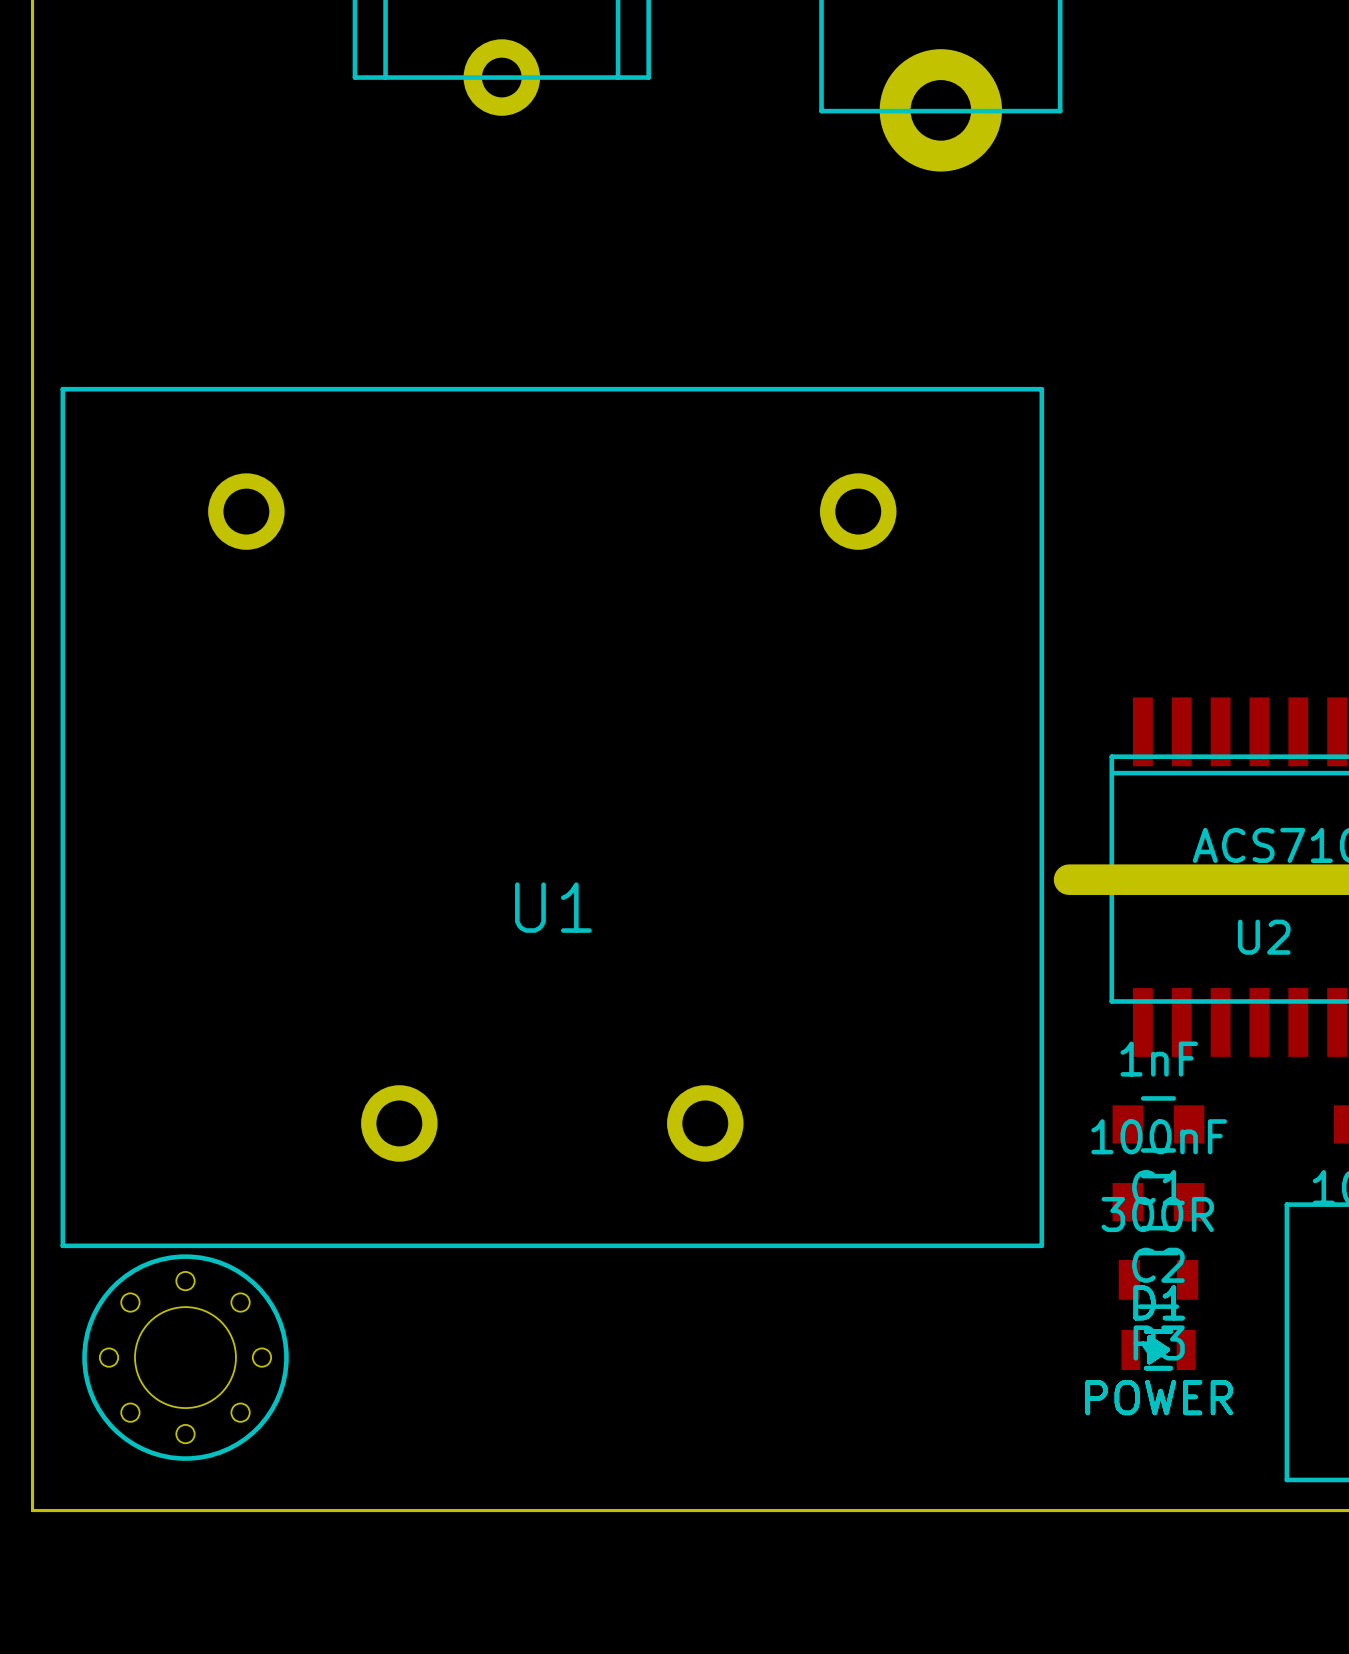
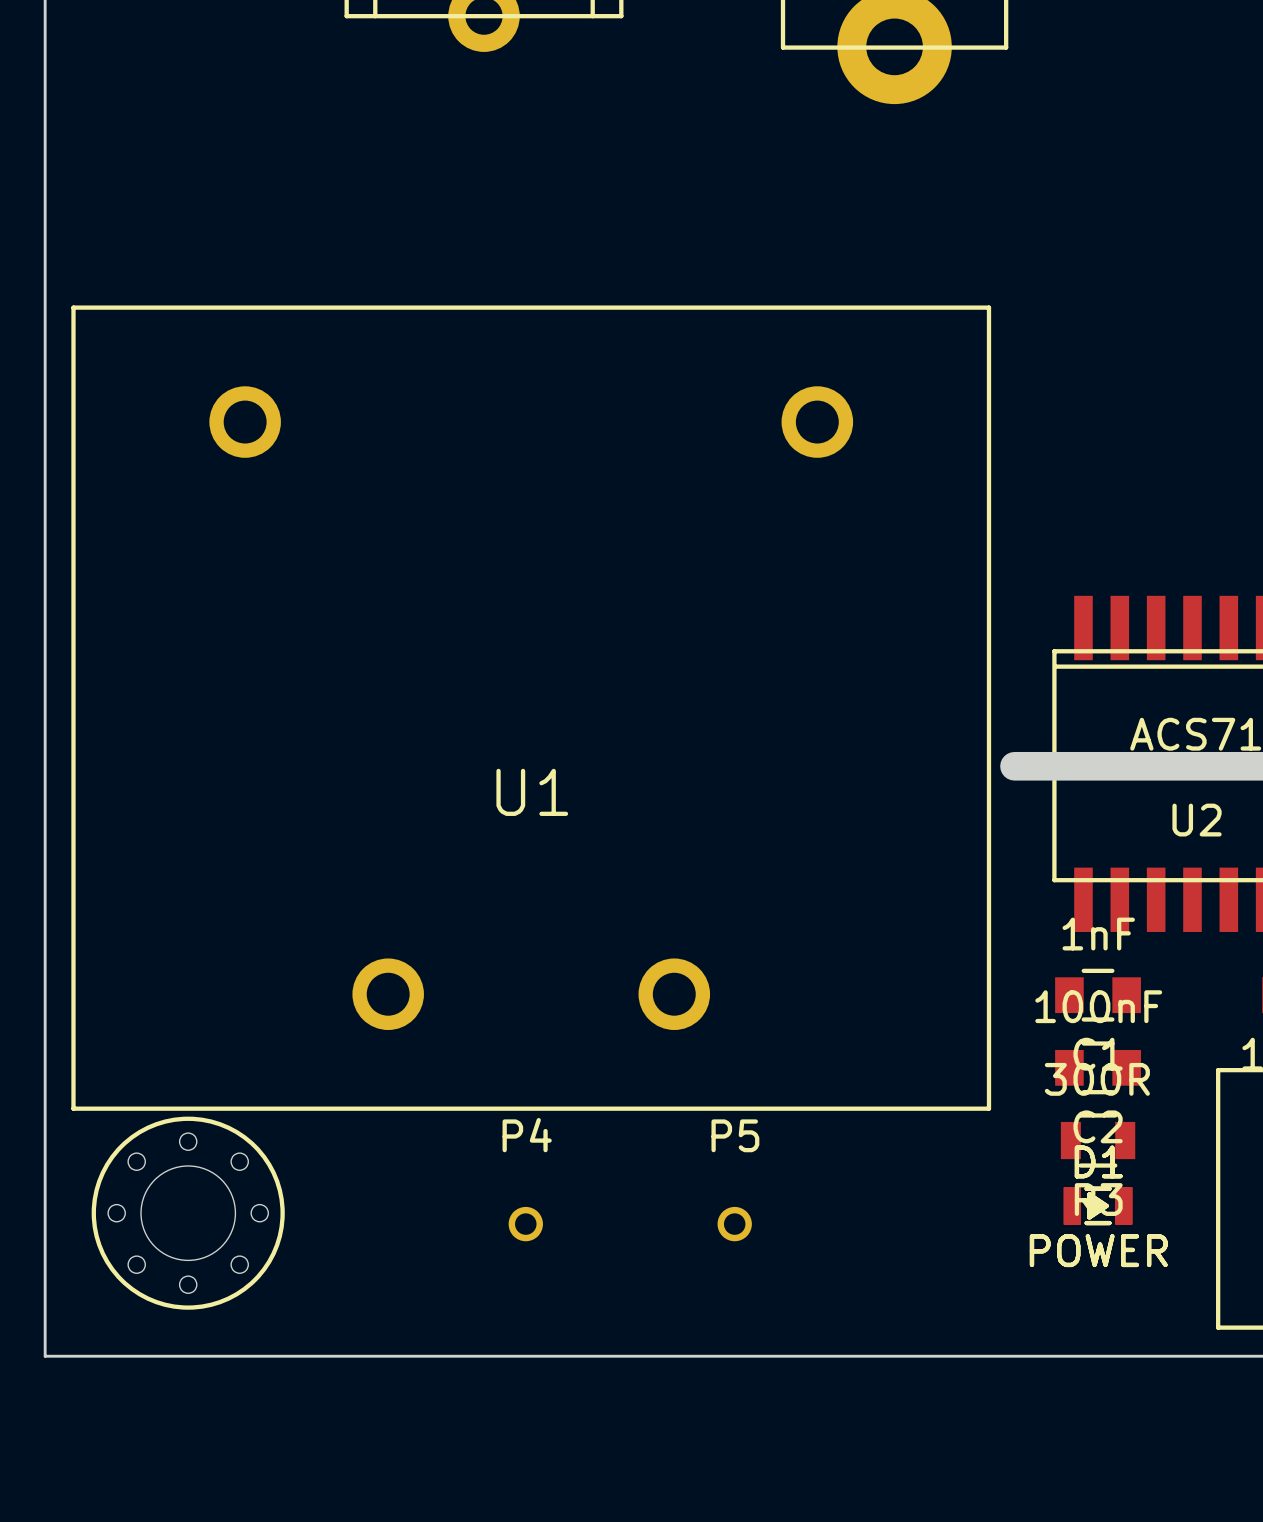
P4: none -> (525, 1224)
P5: none -> (734, 1224)

